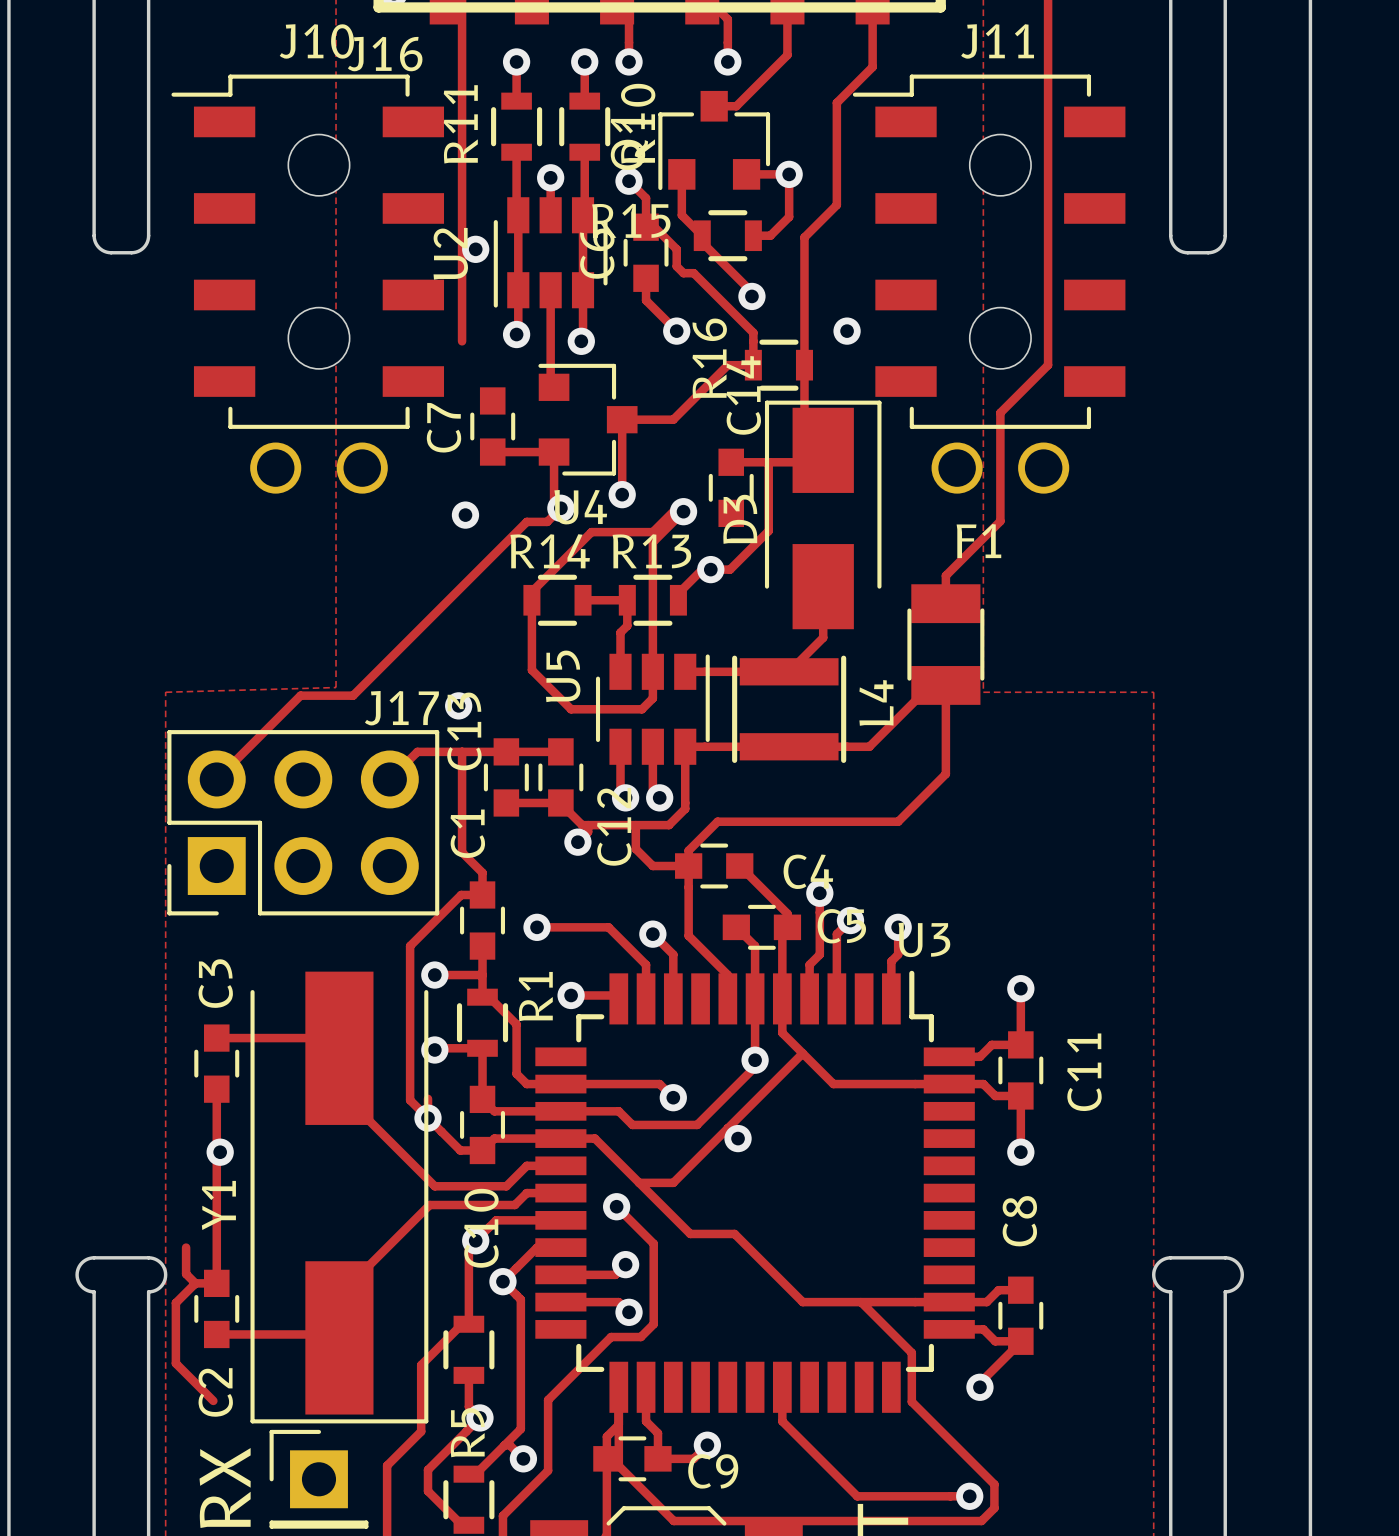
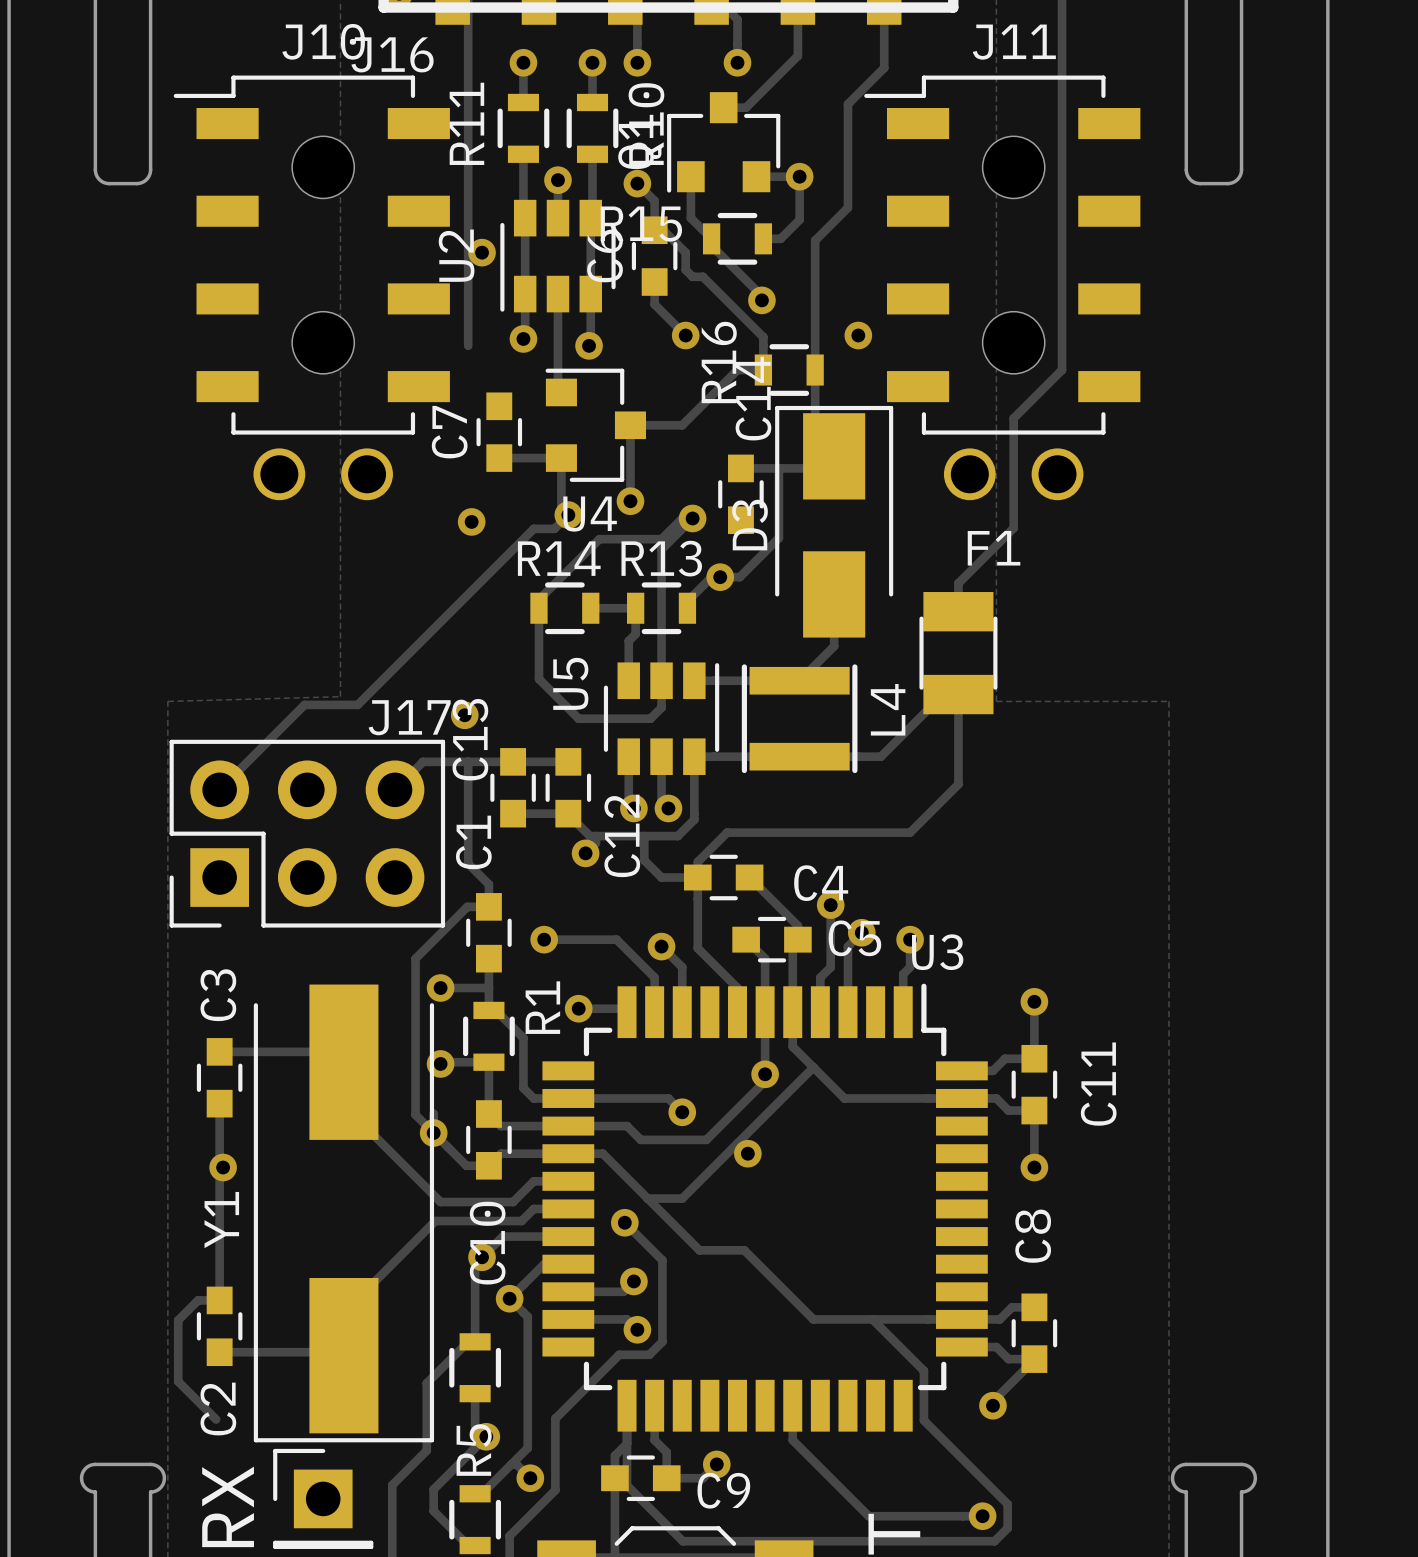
board edge: (94, 167) (94, 240) (100, 249) (111, 252) (136, 252) (143, 247) (147, 242) (148, 167) -> (95, 169) (99, 179) (109, 183) (140, 183) (147, 178) (150, 169)
board edge: (1170, 167) (1171, 240) (1177, 249) (1187, 252) (1212, 252) (1220, 247) (1223, 242) (1225, 167) -> (1186, 169) (1190, 179) (1200, 183) (1231, 183) (1238, 178) (1241, 169)
track: (186, 1247) (186, 1274) (195, 1283) -> none
board edge: (94, 1472) (94, 1291) (82, 1286) (77, 1274) (82, 1262) (94, 1257) (150, 1257) (159, 1261) (165, 1270) (165, 1279) (162, 1285) (157, 1289) (148, 1291) (148, 1472) -> (95, 1492) (86, 1489) (82, 1481) (82, 1472) (88, 1466) (95, 1464) (150, 1464) (160, 1468) (164, 1478) (160, 1487) (150, 1492)
board edge: (1170, 1472) (1170, 1291) (1158, 1286) (1153, 1274) (1158, 1262) (1170, 1257) (1227, 1257) (1235, 1261) (1241, 1270) (1241, 1279) (1238, 1285) (1233, 1289) (1225, 1291) (1225, 1472) -> (1186, 1492) (1177, 1489) (1172, 1481) (1173, 1472) (1179, 1466) (1186, 1464) (1241, 1464) (1251, 1468) (1255, 1478) (1251, 1487) (1241, 1492)

